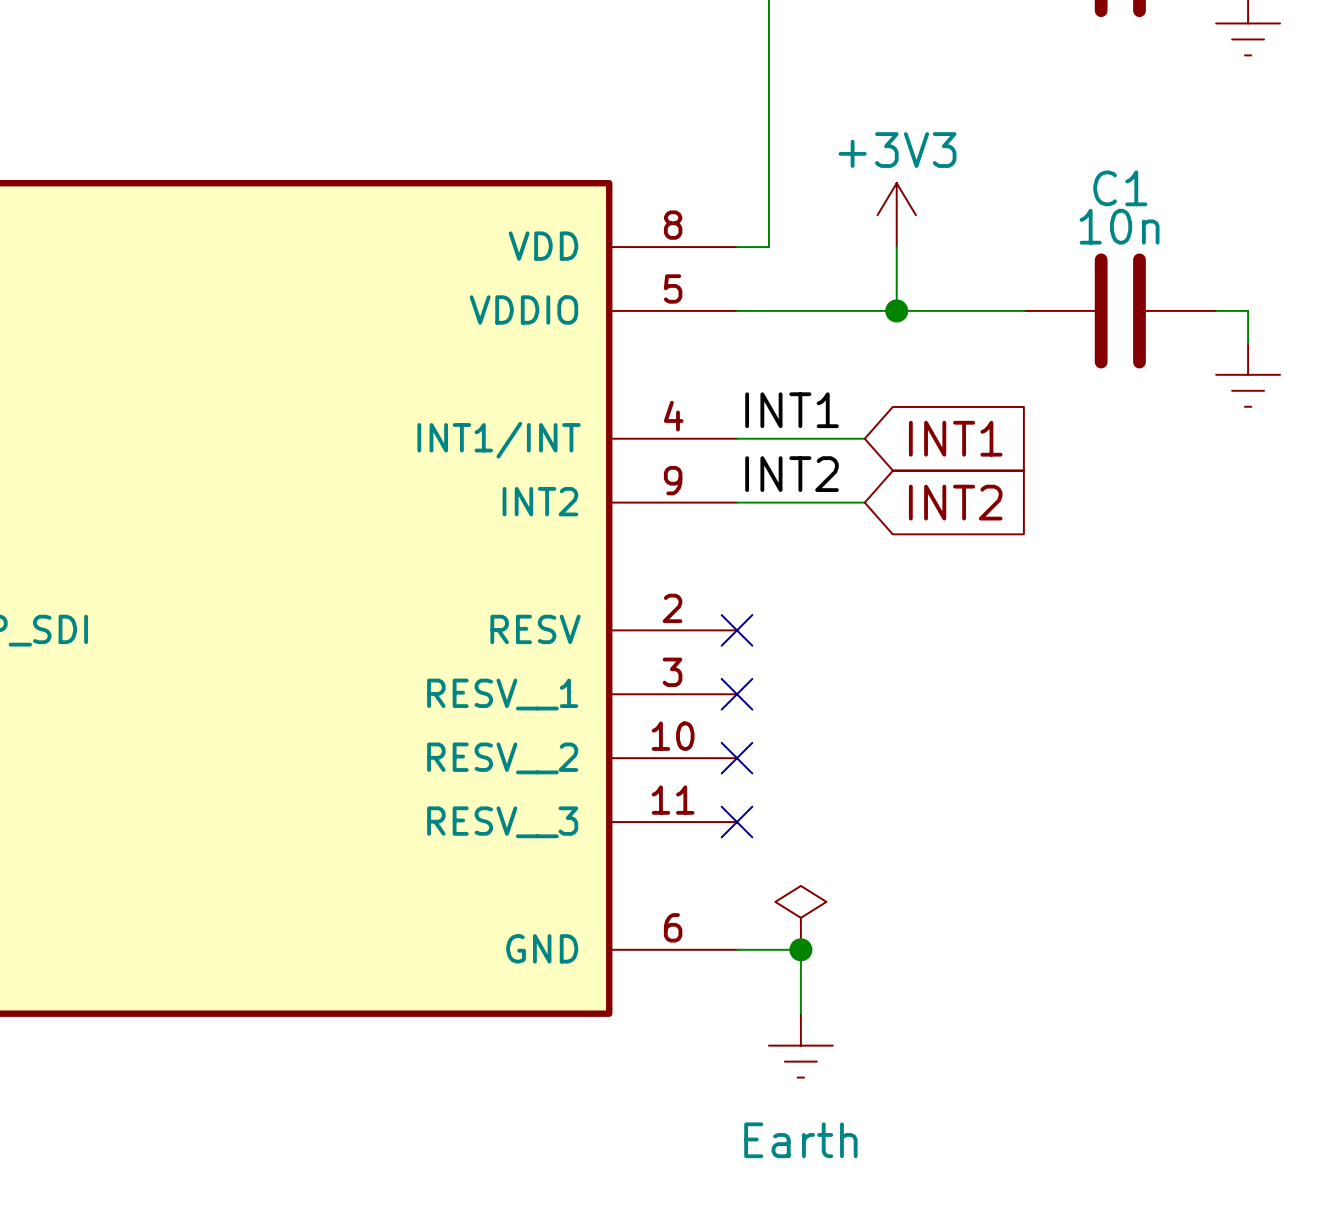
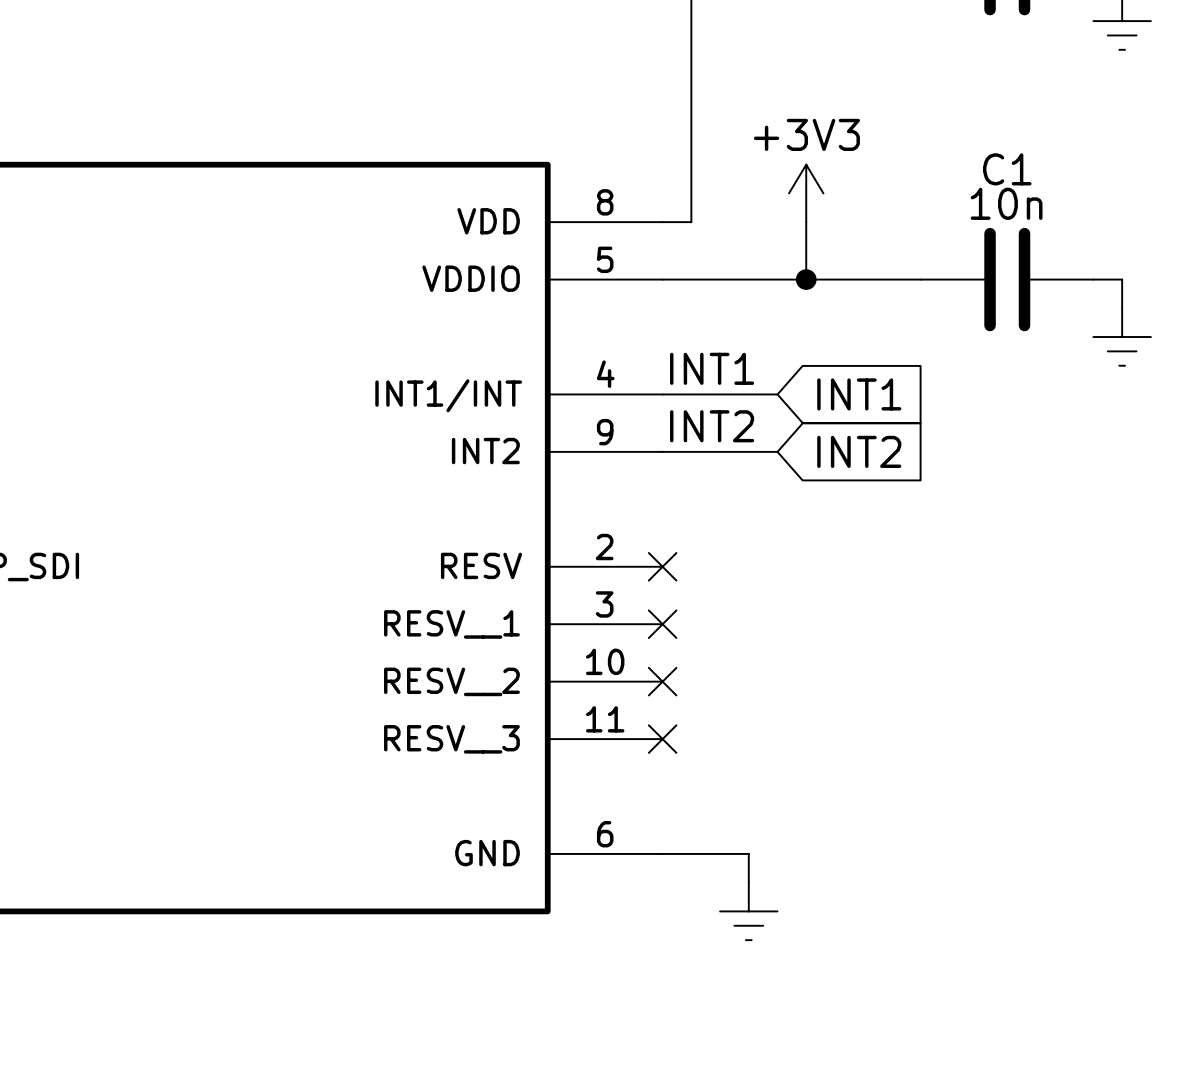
power symbol: (800, 917) -> none
wire: (800, 949) (800, 1013) -> (720, 853) (748, 853) (748, 882)
junction: (800, 949) -> none
power symbol: none -> (748, 911)
power symbol: Earth (800, 1045) -> none

